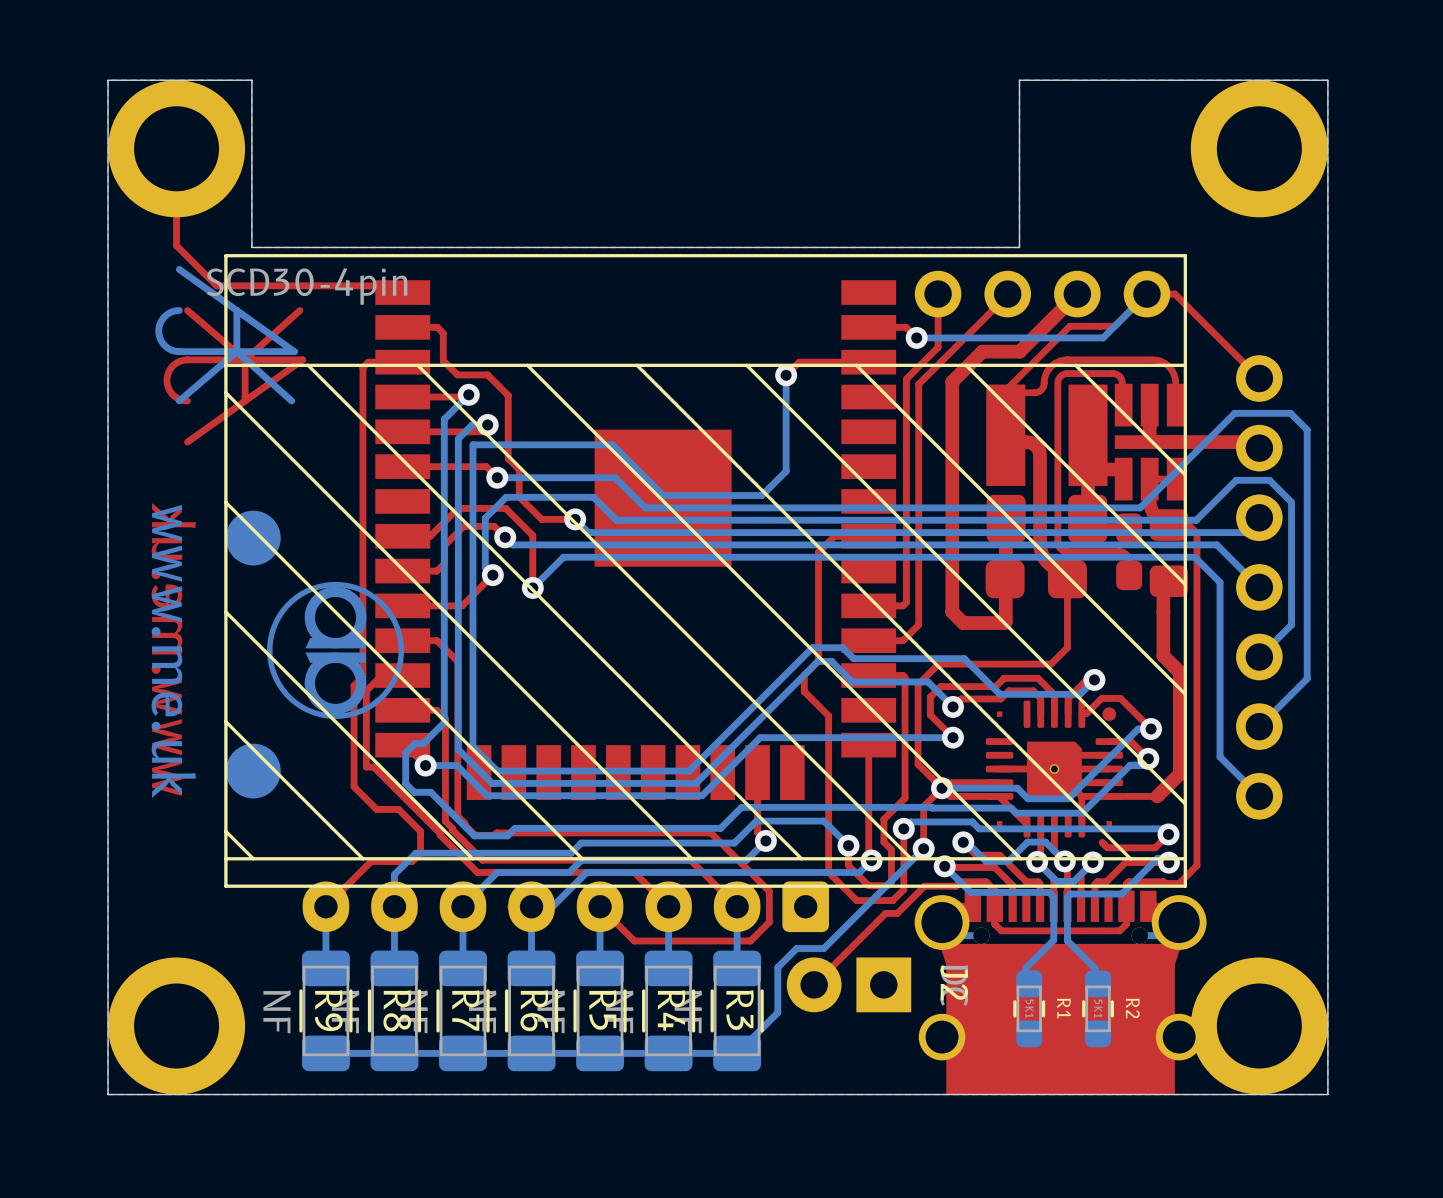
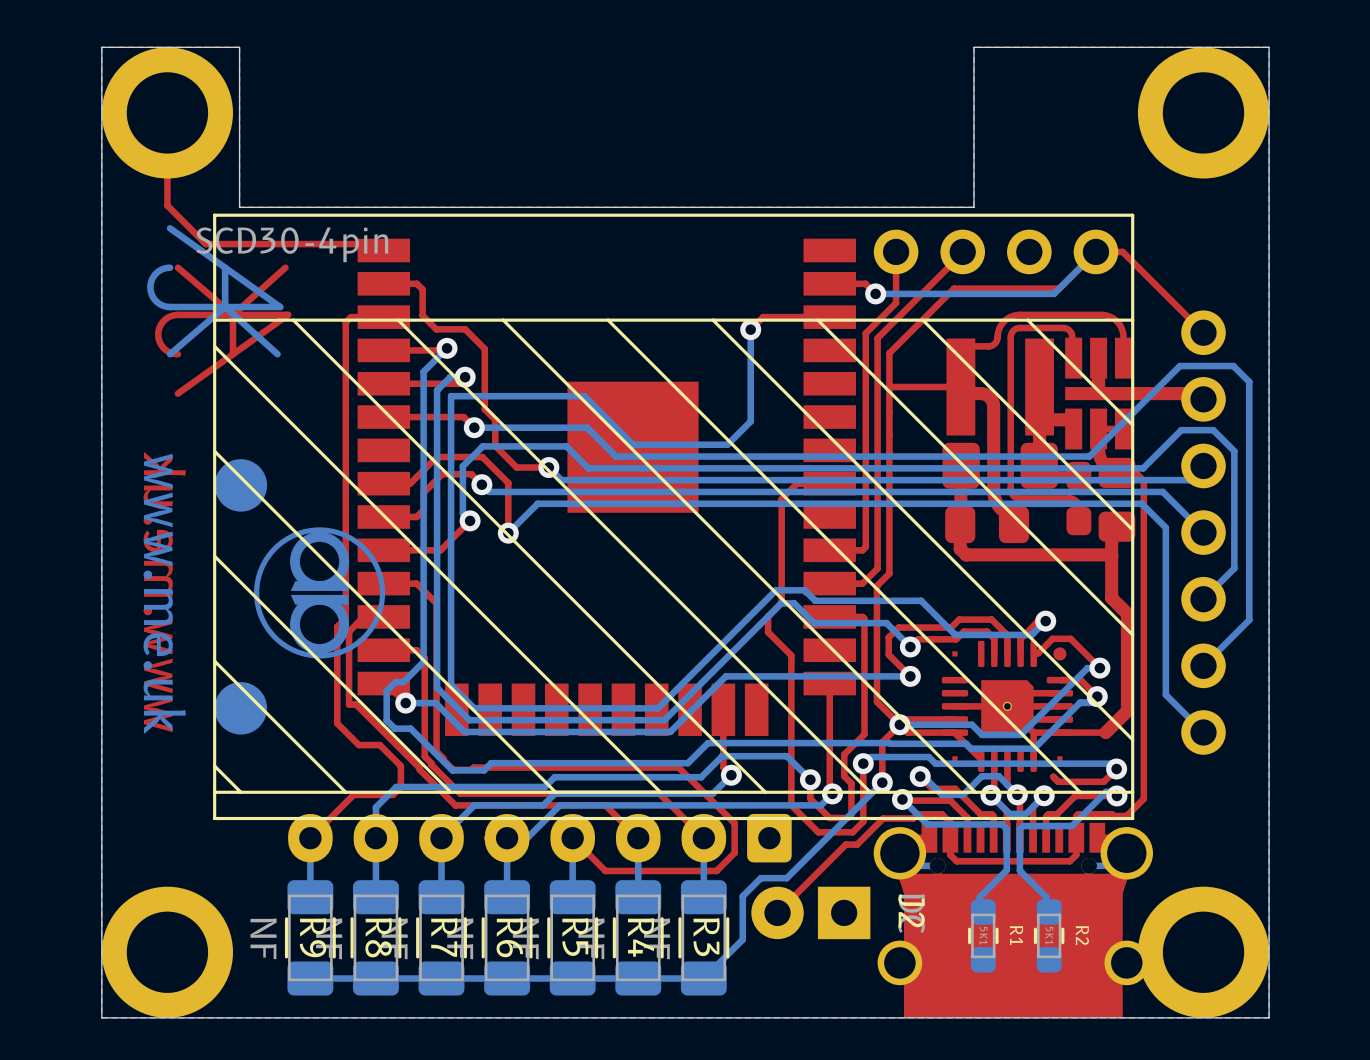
top track: (1077, 294) (1019, 351) (982, 351) (952, 381) (952, 612) (963, 623) (1005, 621) (1005, 551) -> none
top track: (1114, 326) (1069, 326) (1008, 387) (1008, 468) -> (1065, 282) (1059, 288) (953, 288) (889, 353) (889, 573) (876, 586) (876, 625)
part footprint: [985, 356, 1189, 599] -> [942, 311, 1136, 544]
top track: none -> (960, 387) (889, 387)
top track: none -> (960, 524) (960, 549) (966, 554) (1111, 556)
top track: (1067, 579) (1067, 647) (1051, 664) (938, 664) (918, 684) -> none

